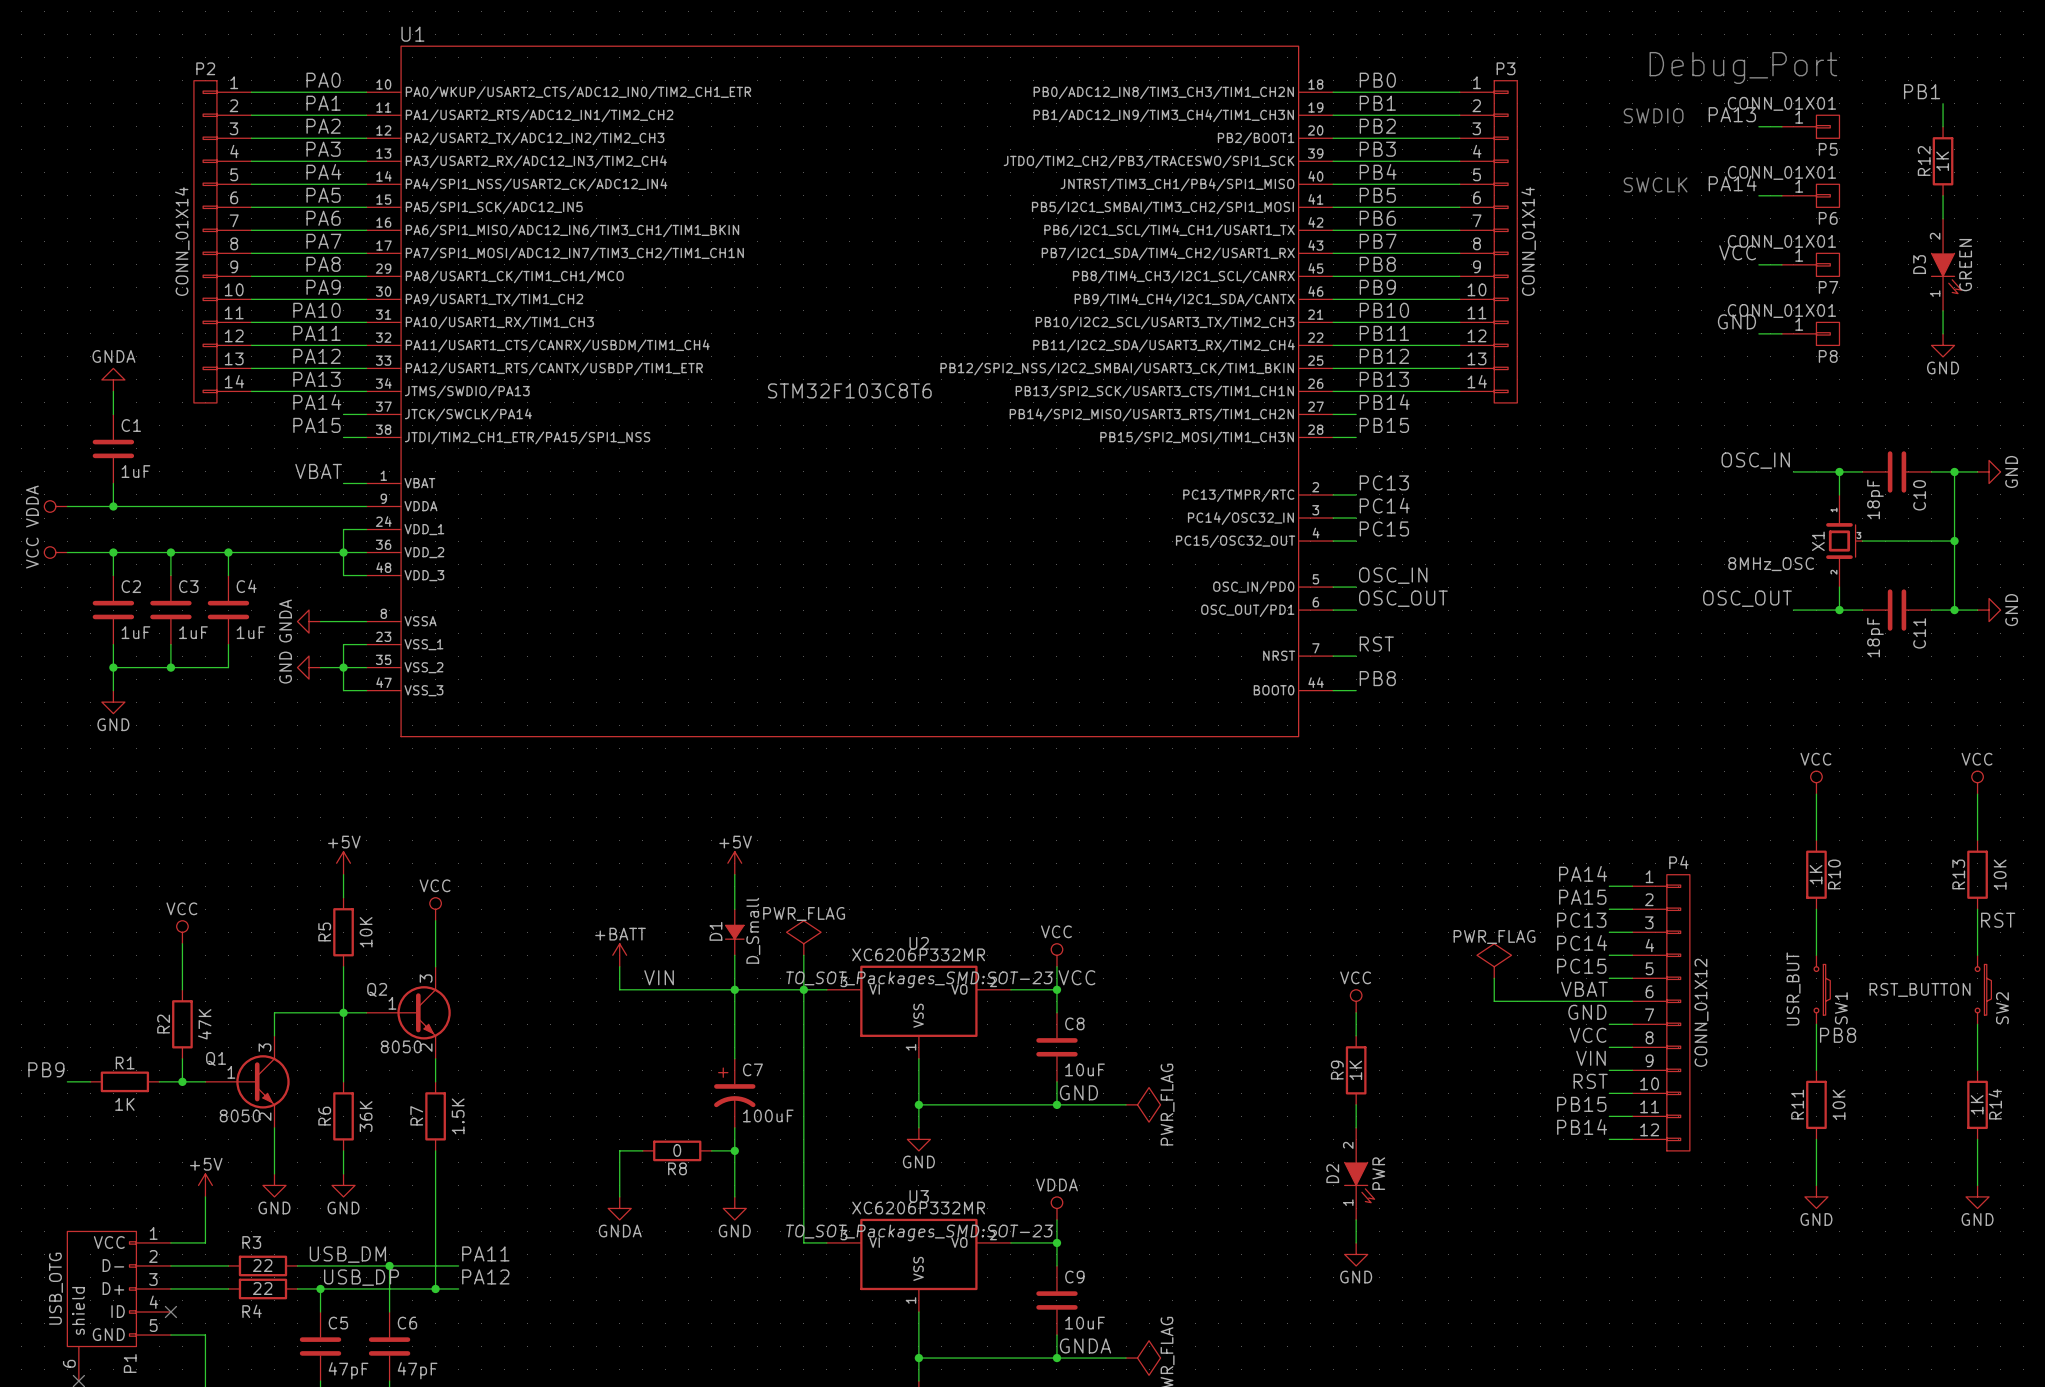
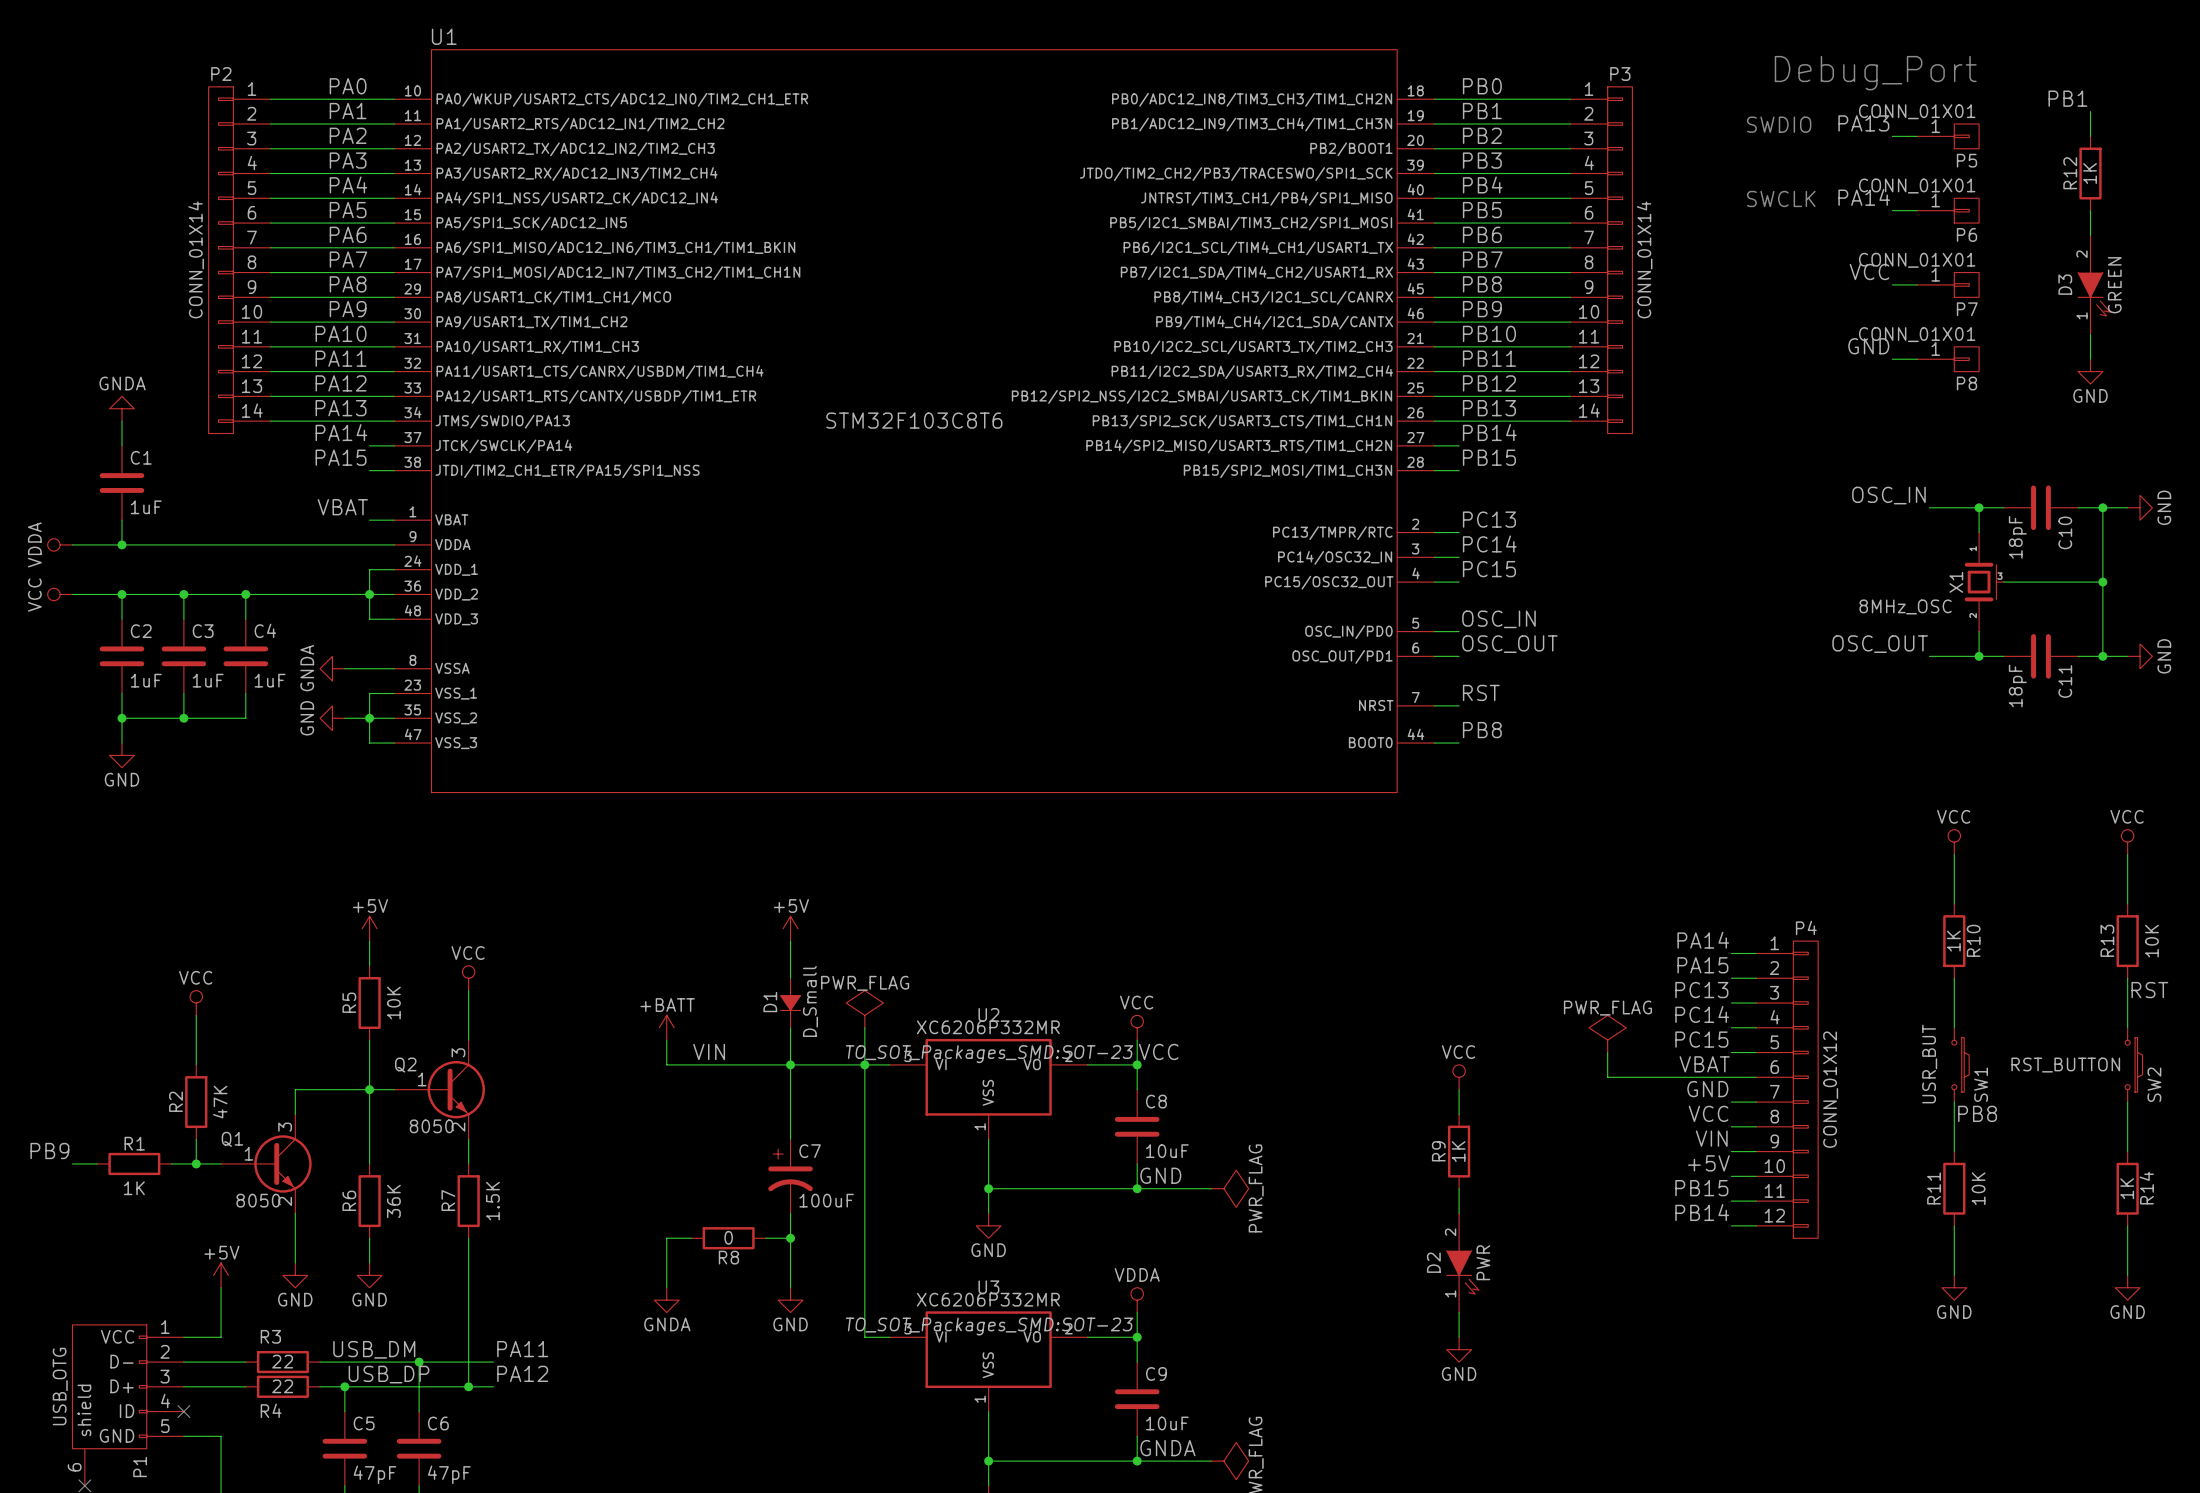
label: RST (1590, 1081) -> +5V (1708, 1163)

